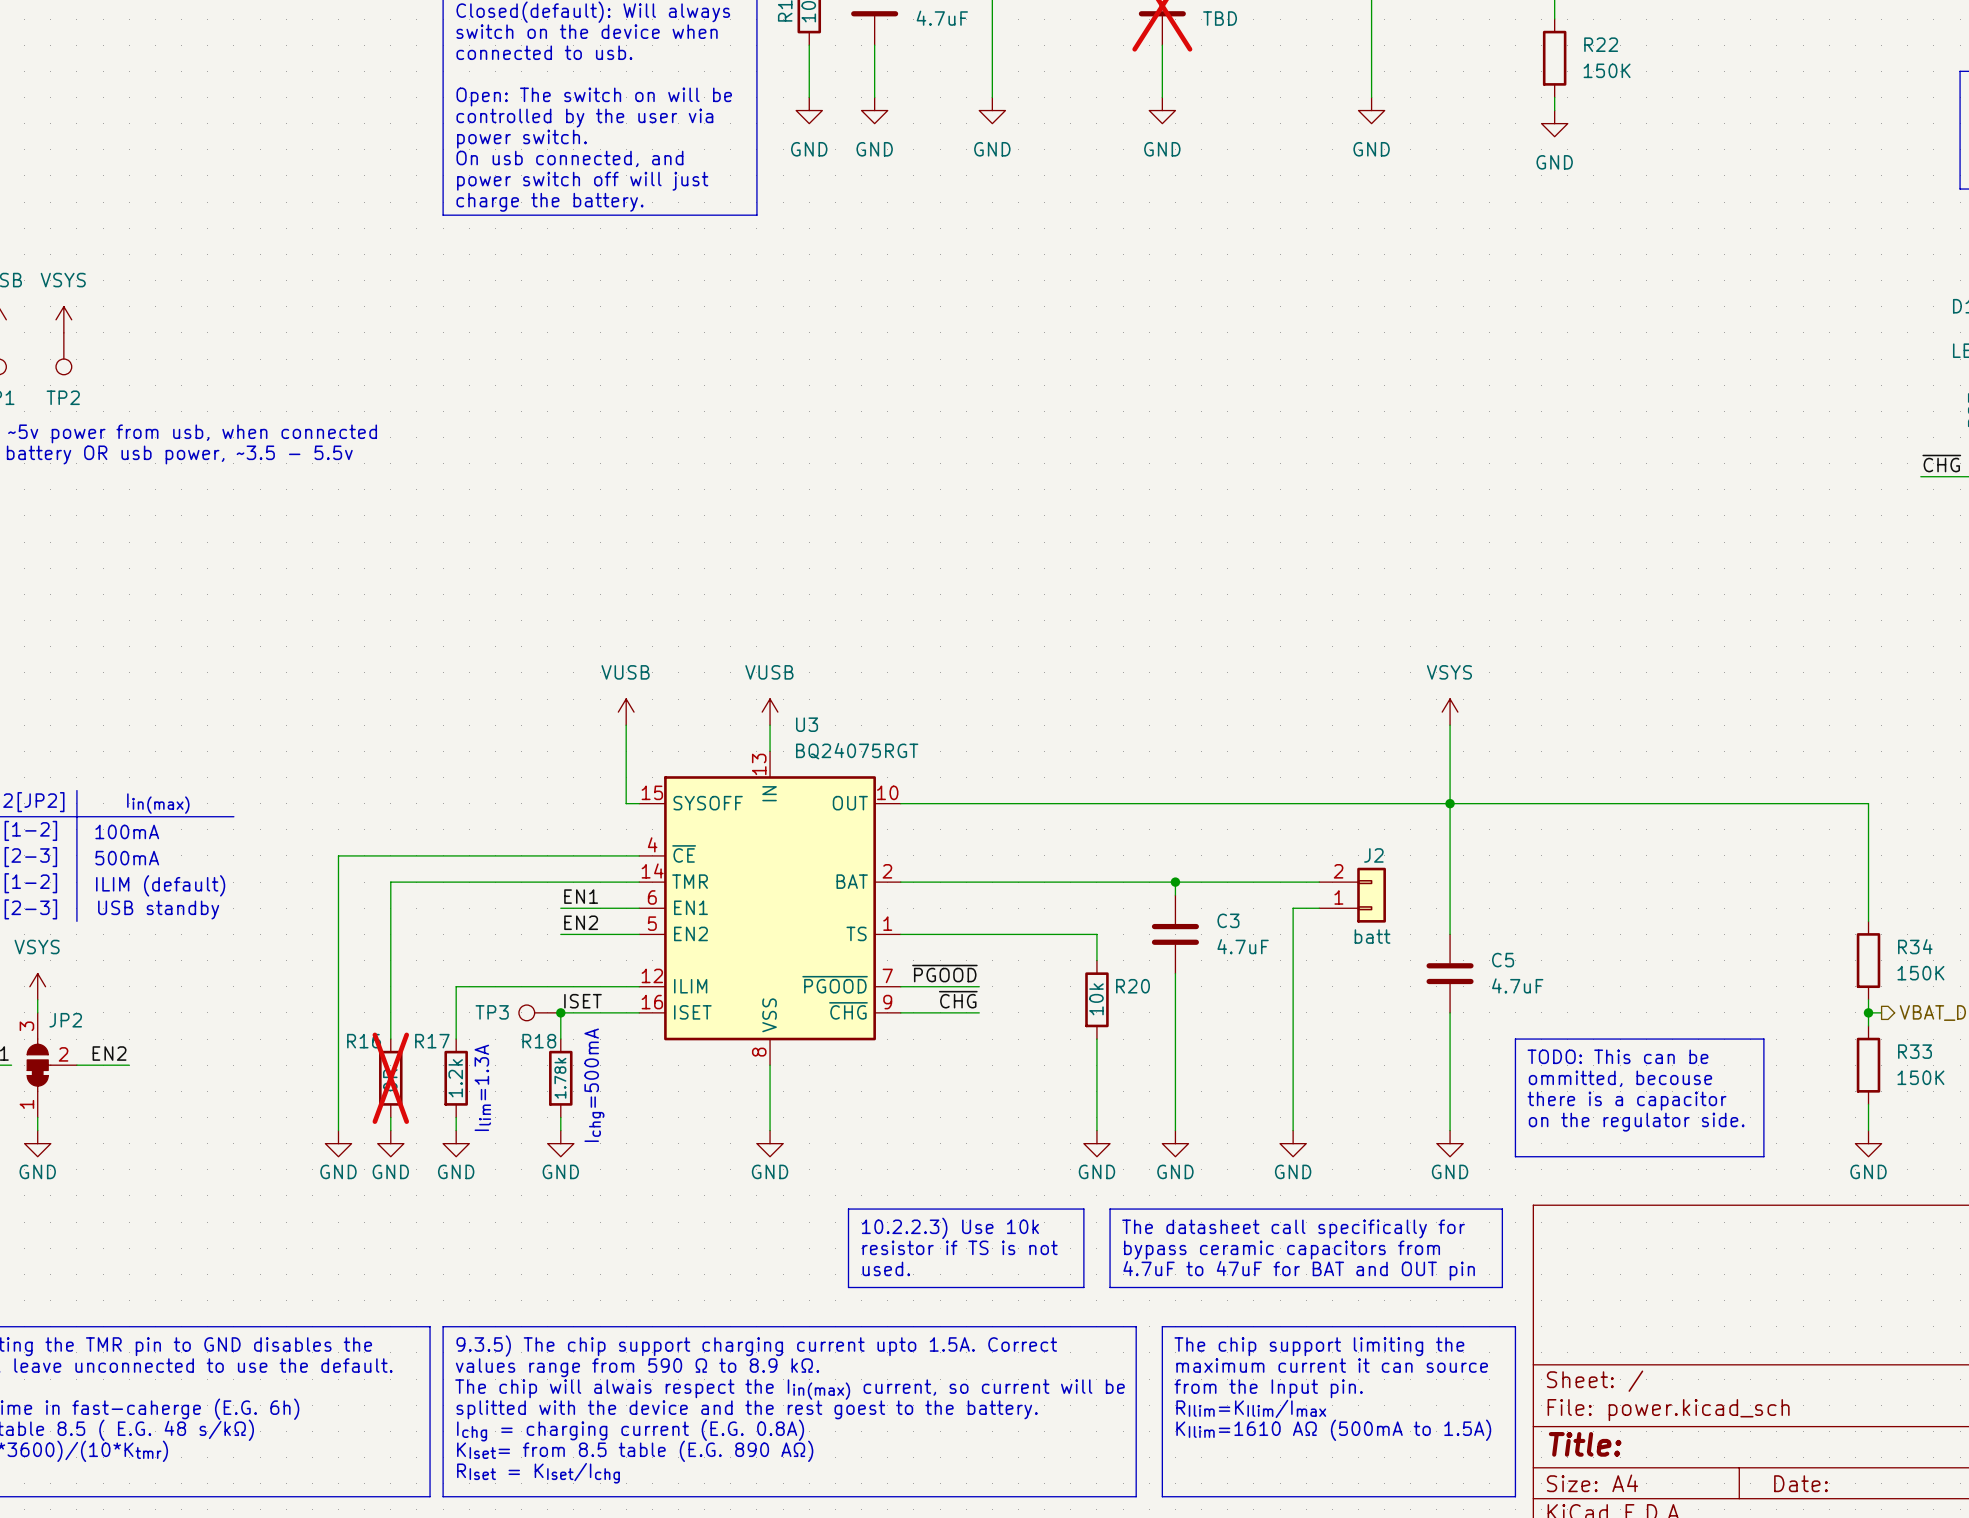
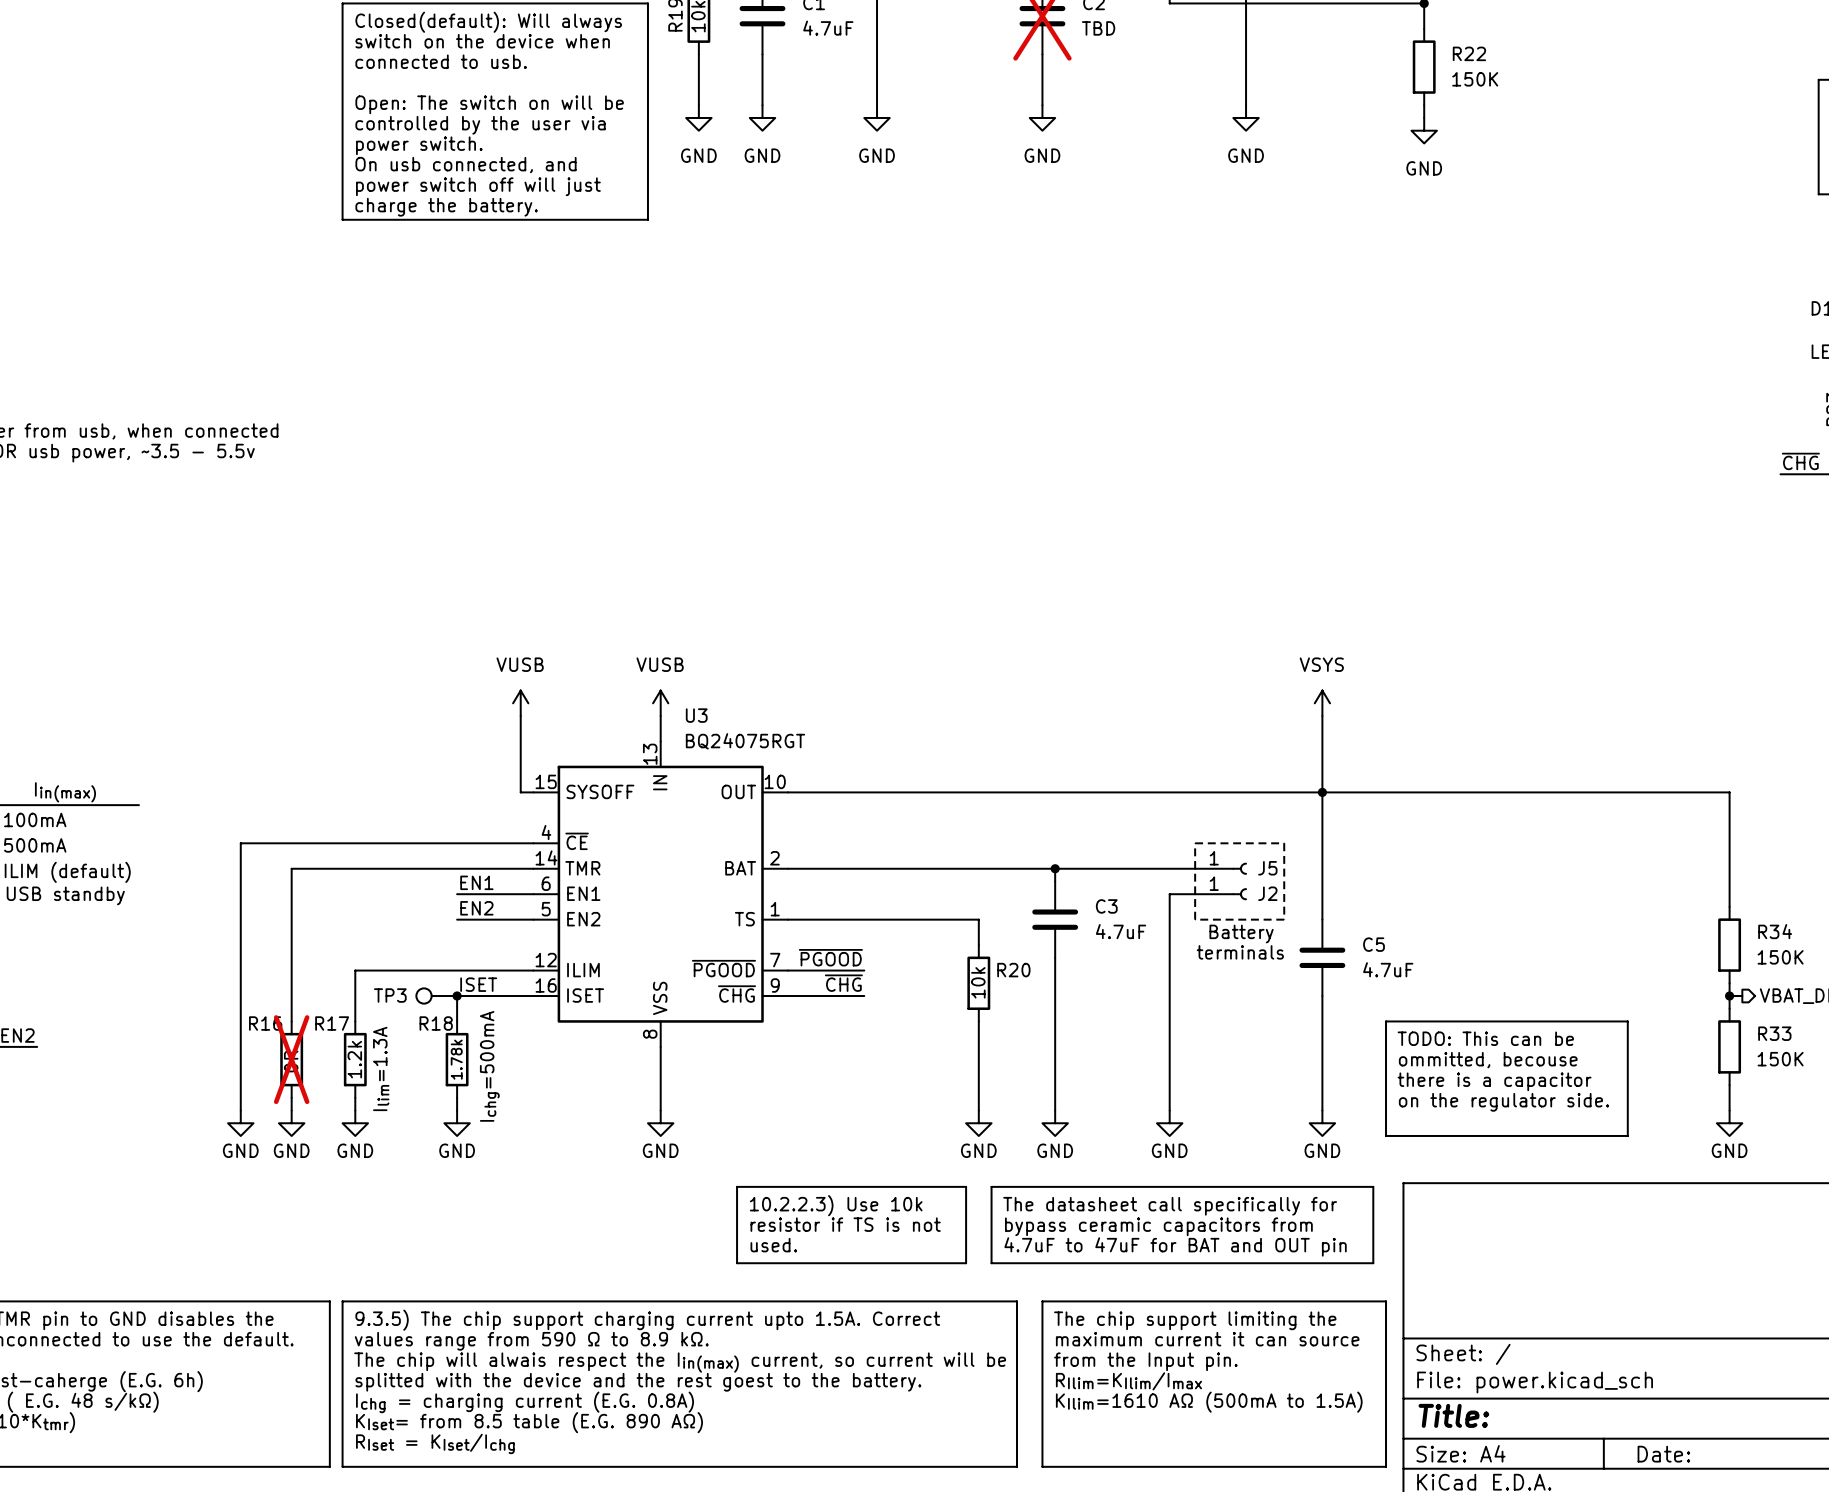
line: none -> (1195, 843) (1284, 843) (1284, 919) (1195, 919) (1195, 843)
J2 name position: J2 (1373, 855) -> J2 (1267, 893)
J2 symbol: [1319, 867, 1386, 923] -> [1195, 888, 1247, 901]
J5: none -> (1220, 868)
J2 value: batt (1372, 936) -> none
text: none -> Battery (1241, 934)
text: none -> terminals (1240, 952)

